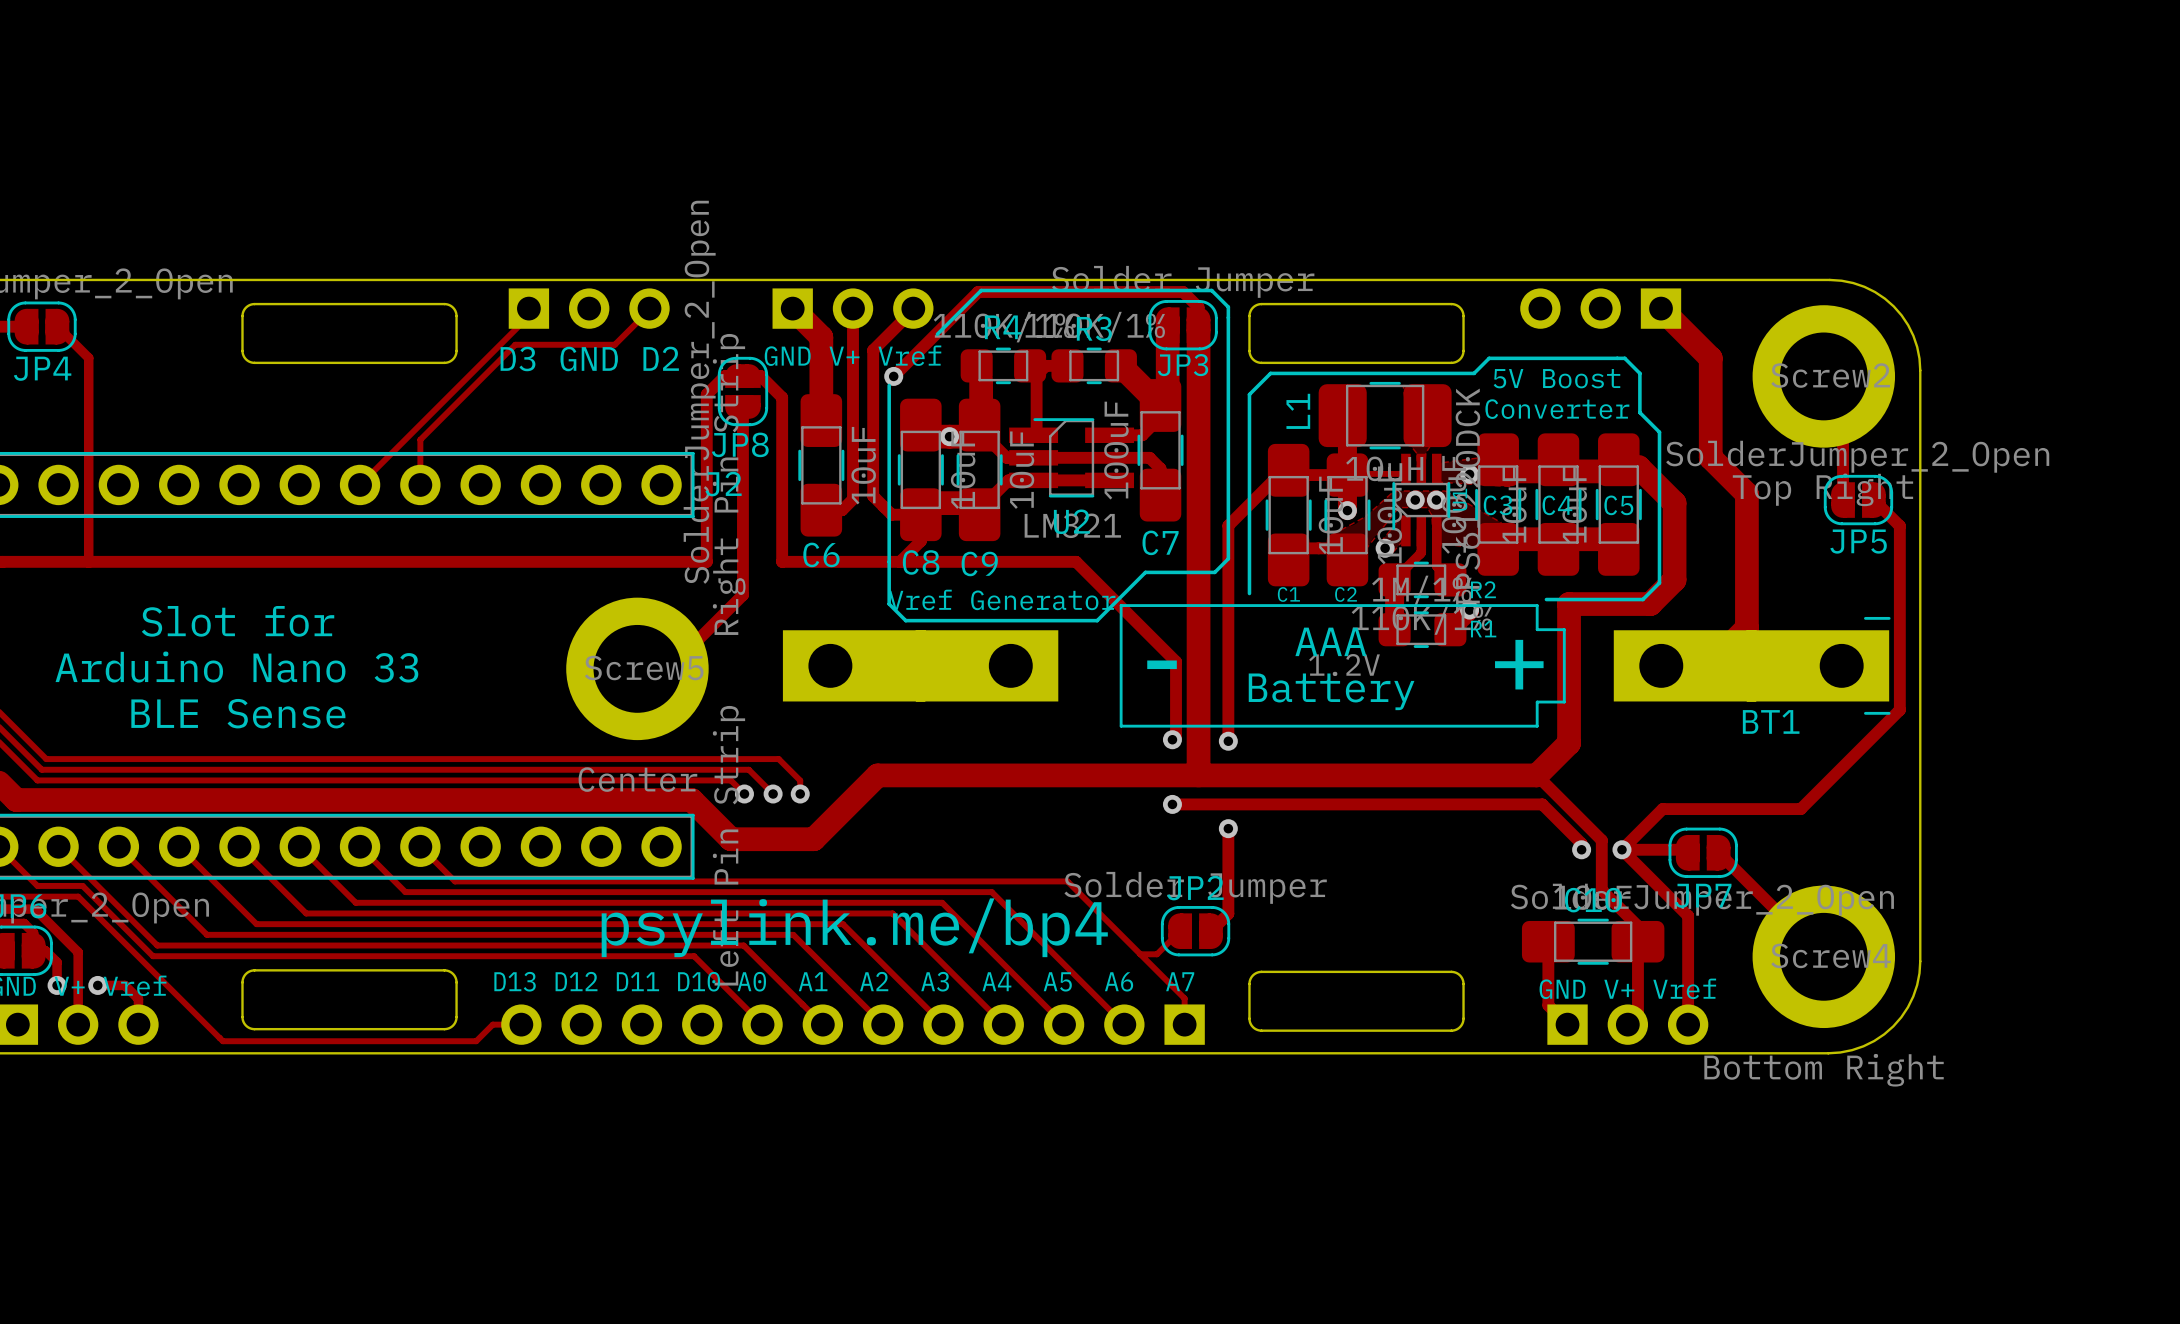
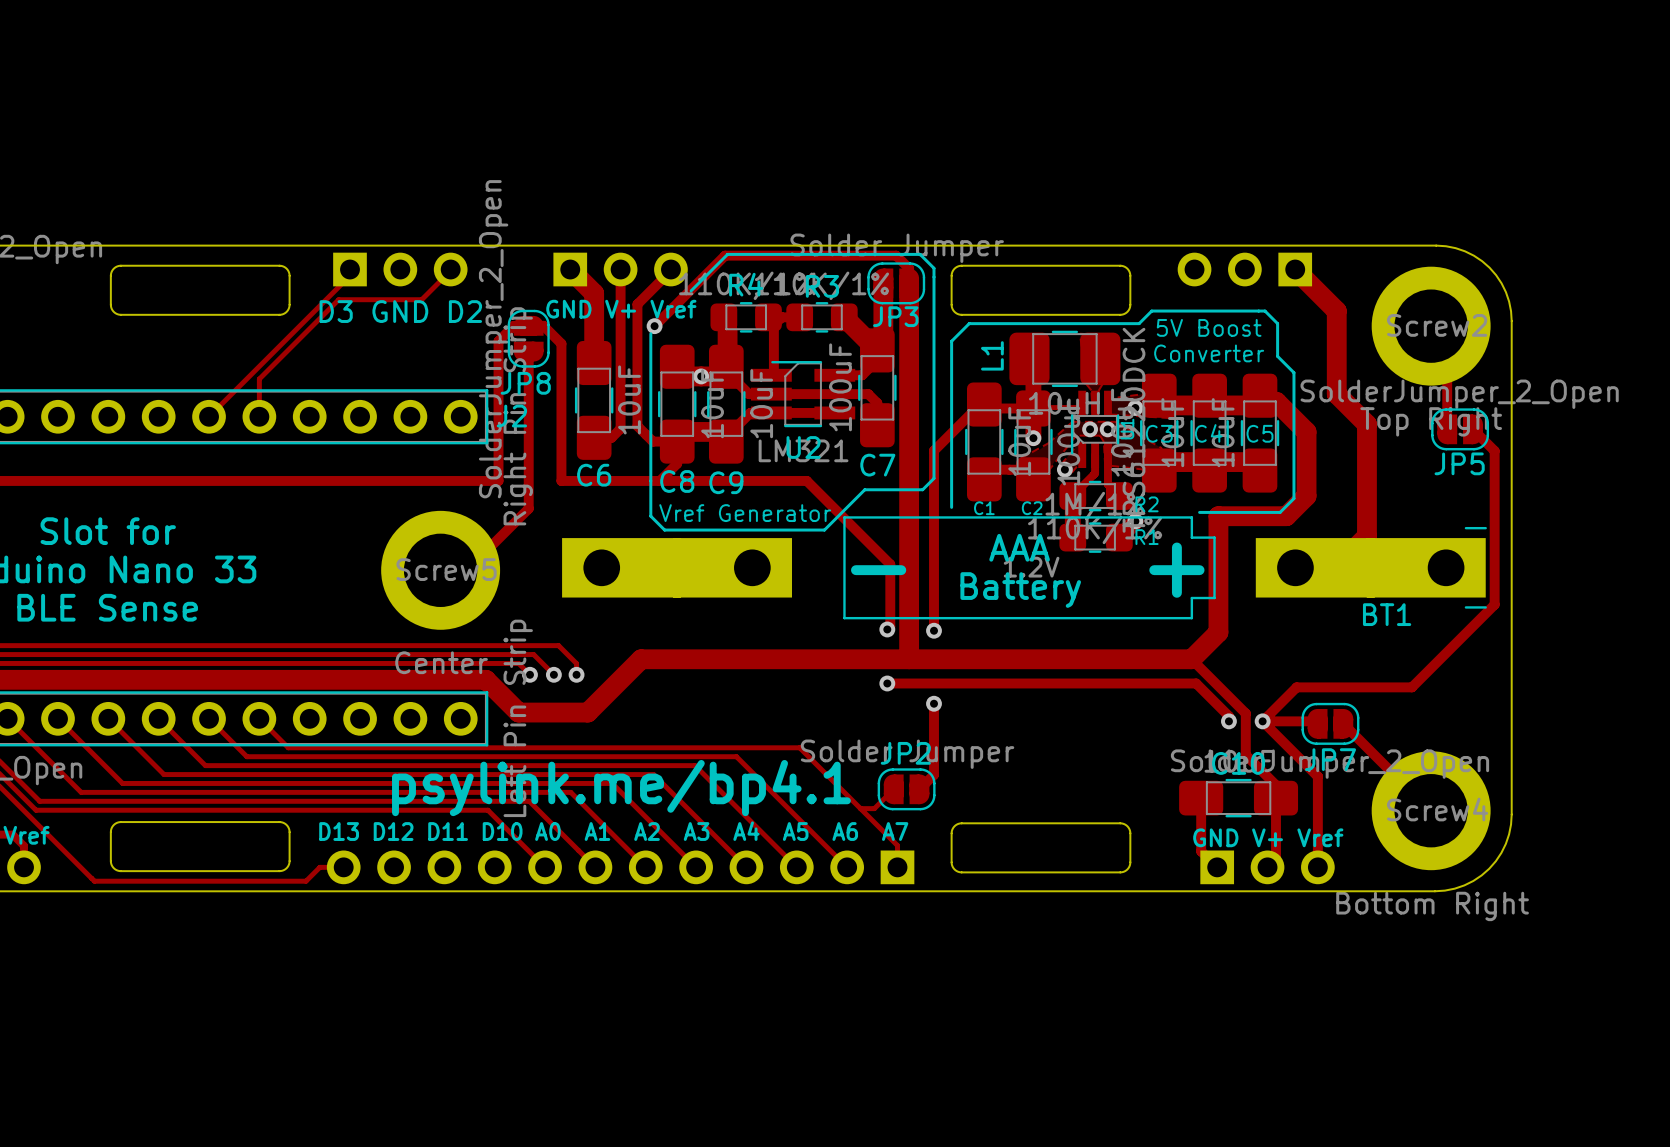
text: psylink.me/bp4 (854, 927) -> psylink.me/bp4.1 (621, 788)

